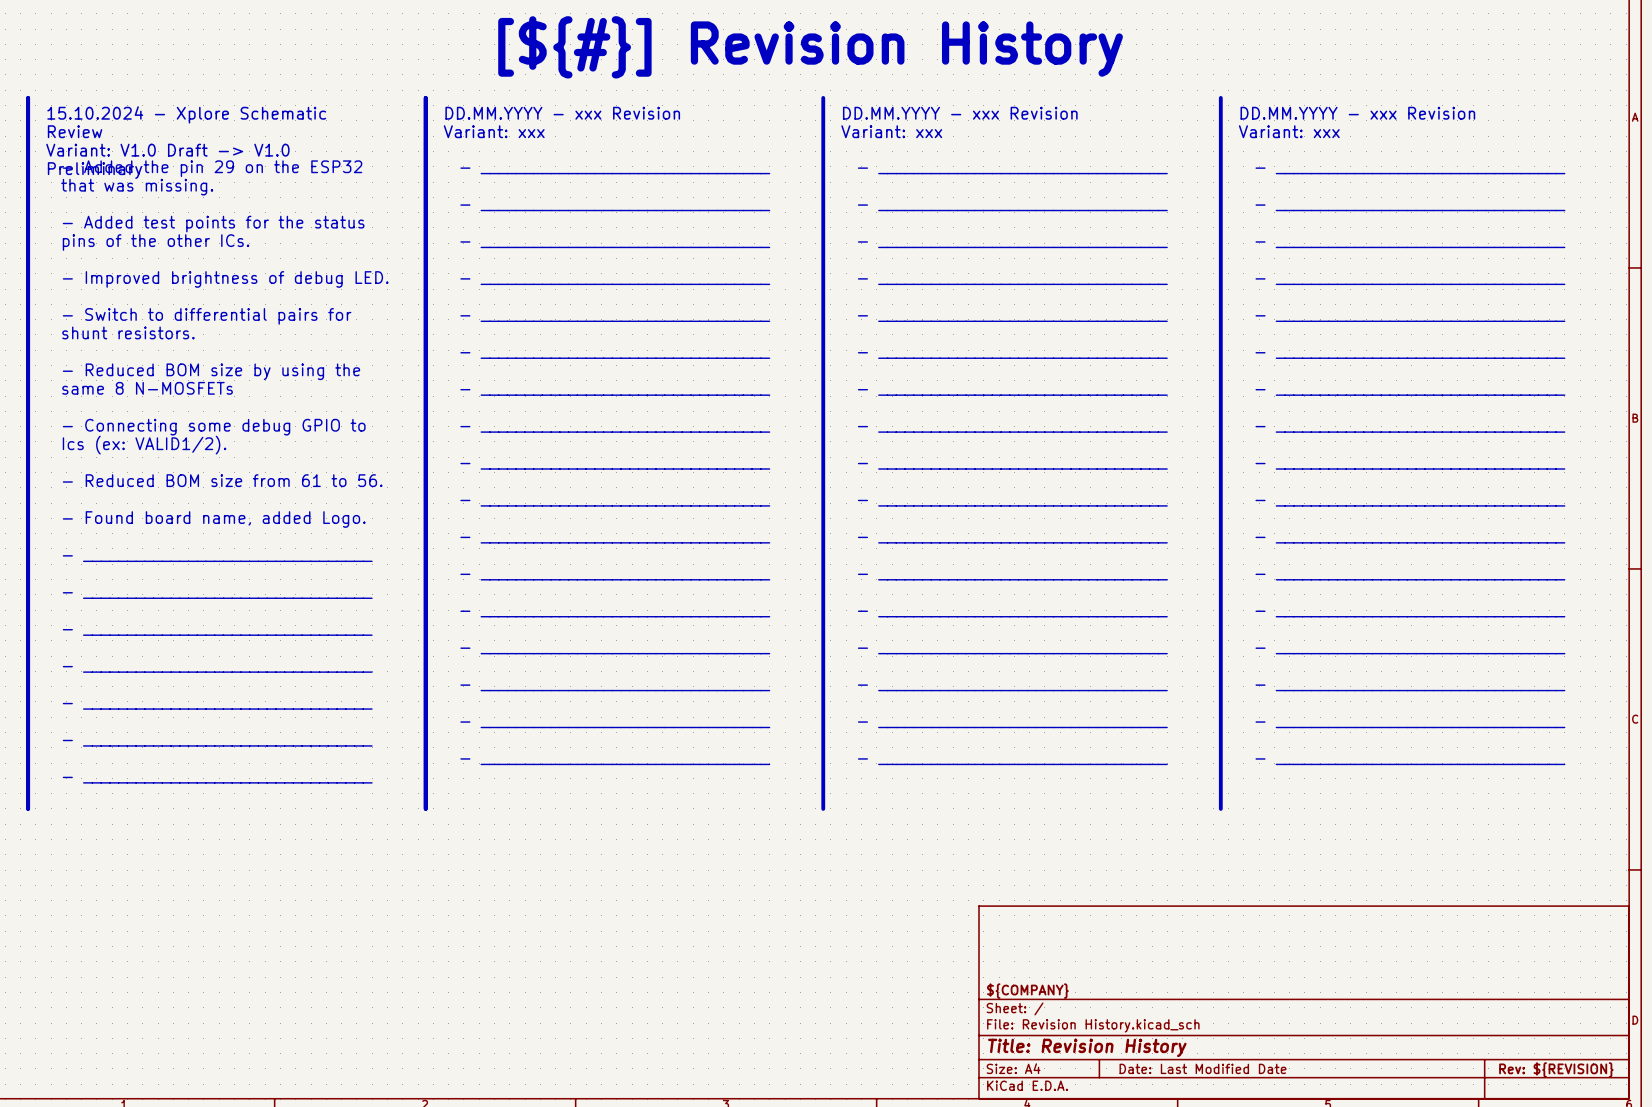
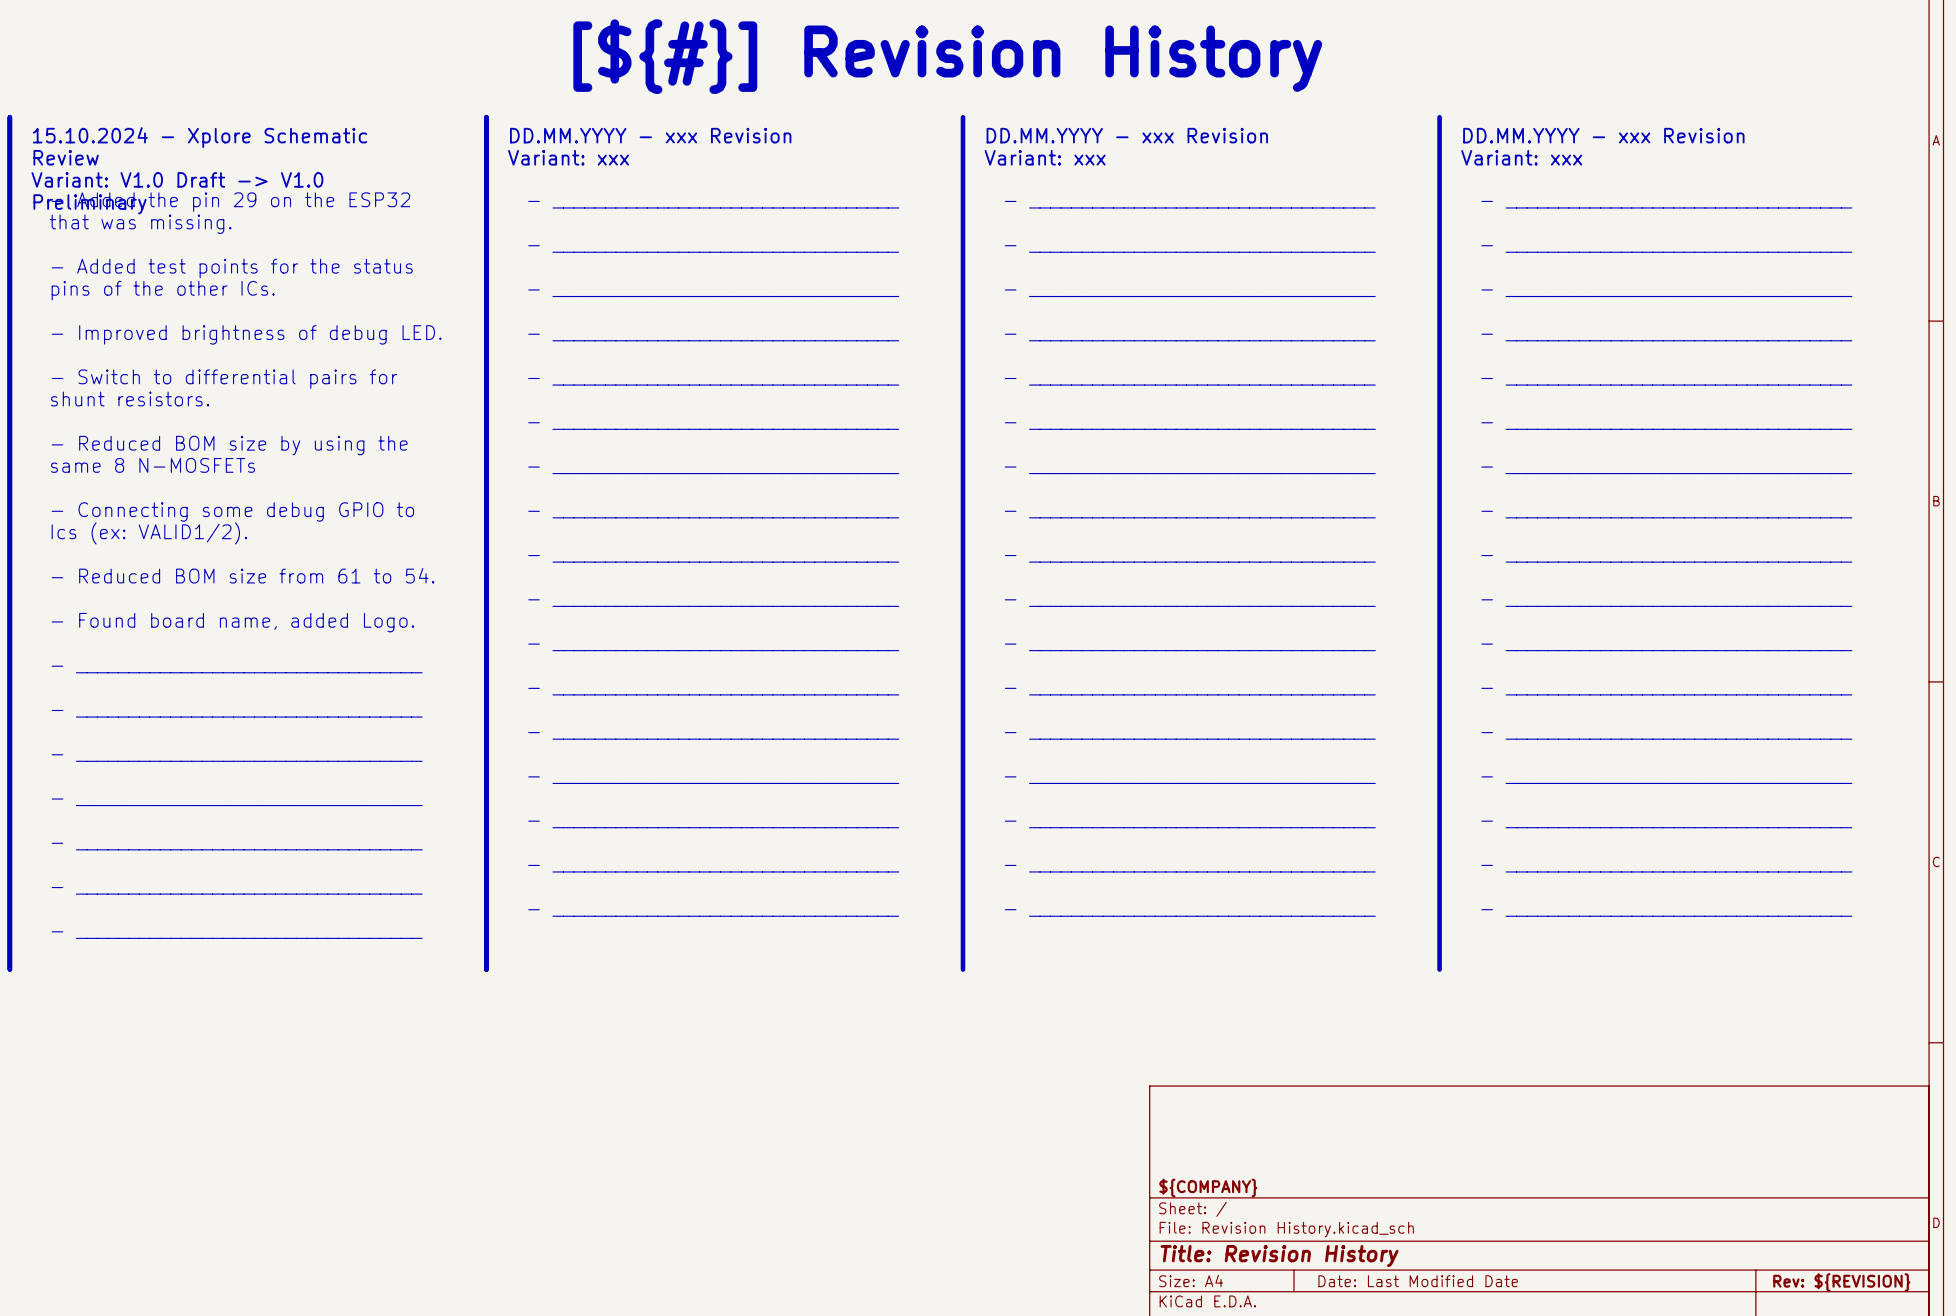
text: - Reduced BOM size from 61 to 56. (222, 480) -> - Reduced BOM size from 61 to 54. (243, 575)

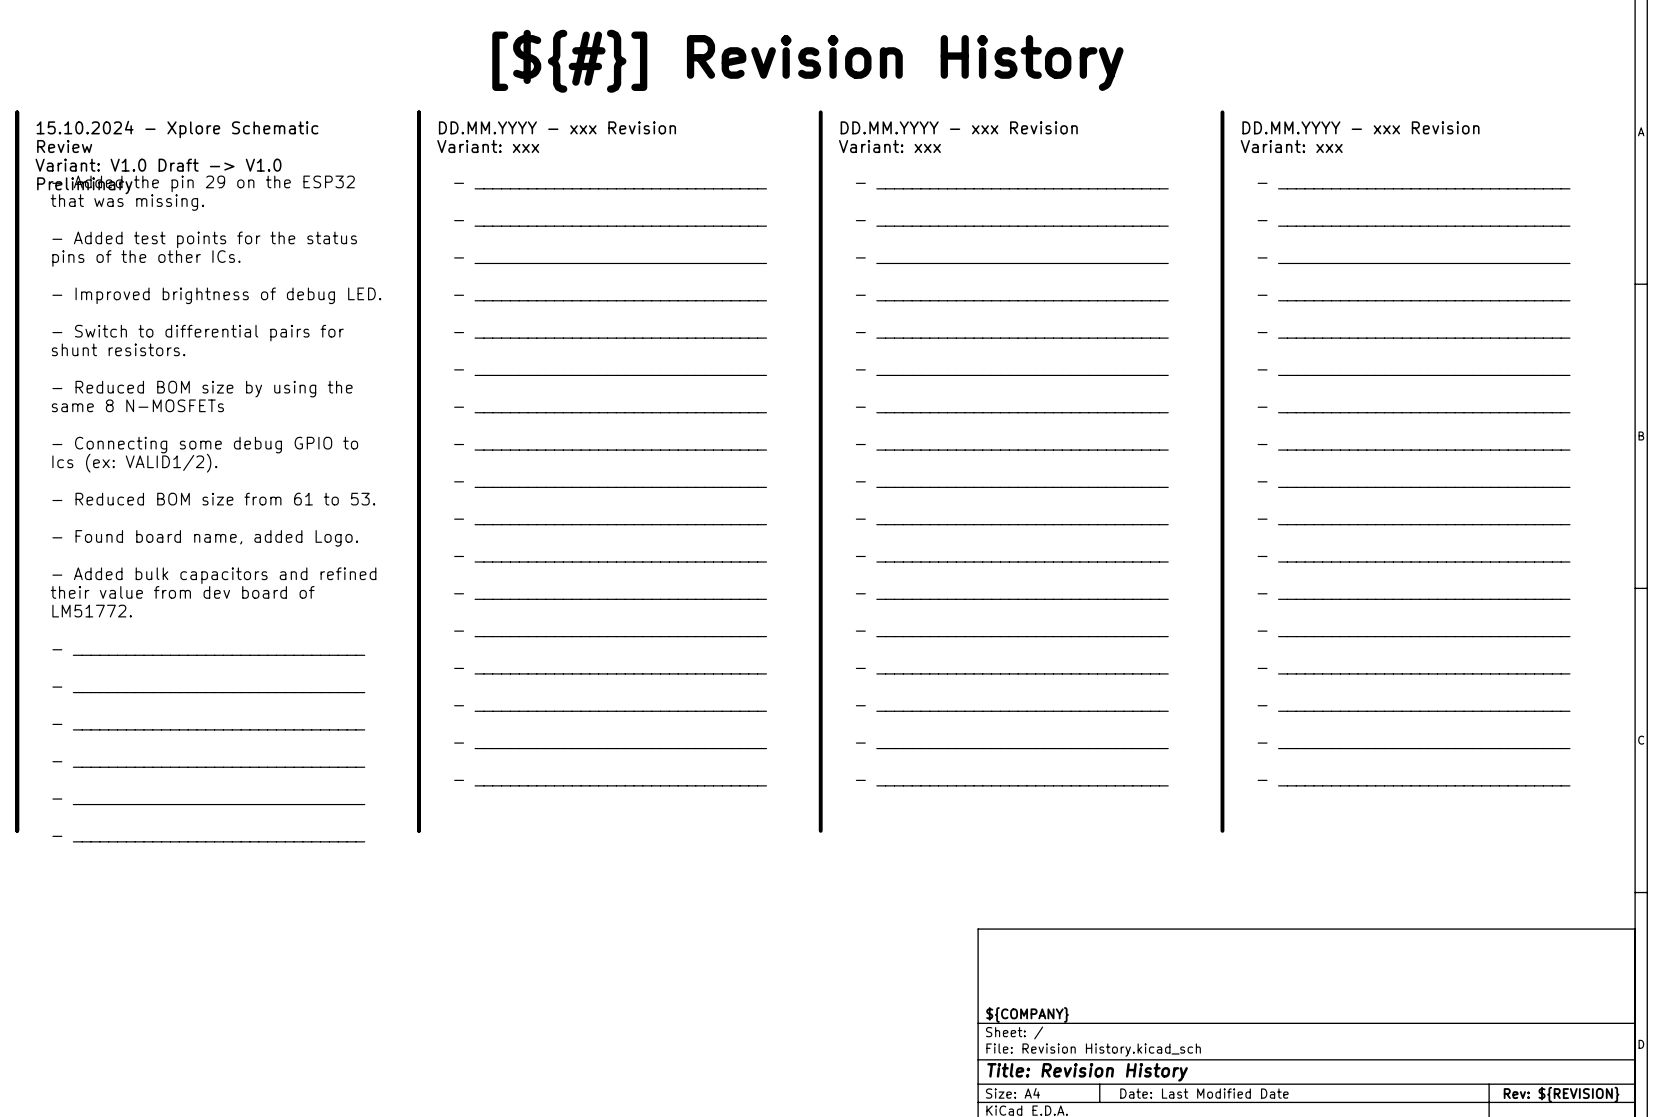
text: - Reduced BOM size from 61 to 54. (243, 575) -> - Reduced BOM size from 61 to 53. (213, 499)
text: - _________________________________ (237, 669) -> - Added bulk capacitors and refined (214, 575)
text: none -> their value from dev board of (182, 592)
text: - _________________________________ (237, 713) -> LM51772. (92, 611)
text: none -> - _________________________________ (208, 839)

